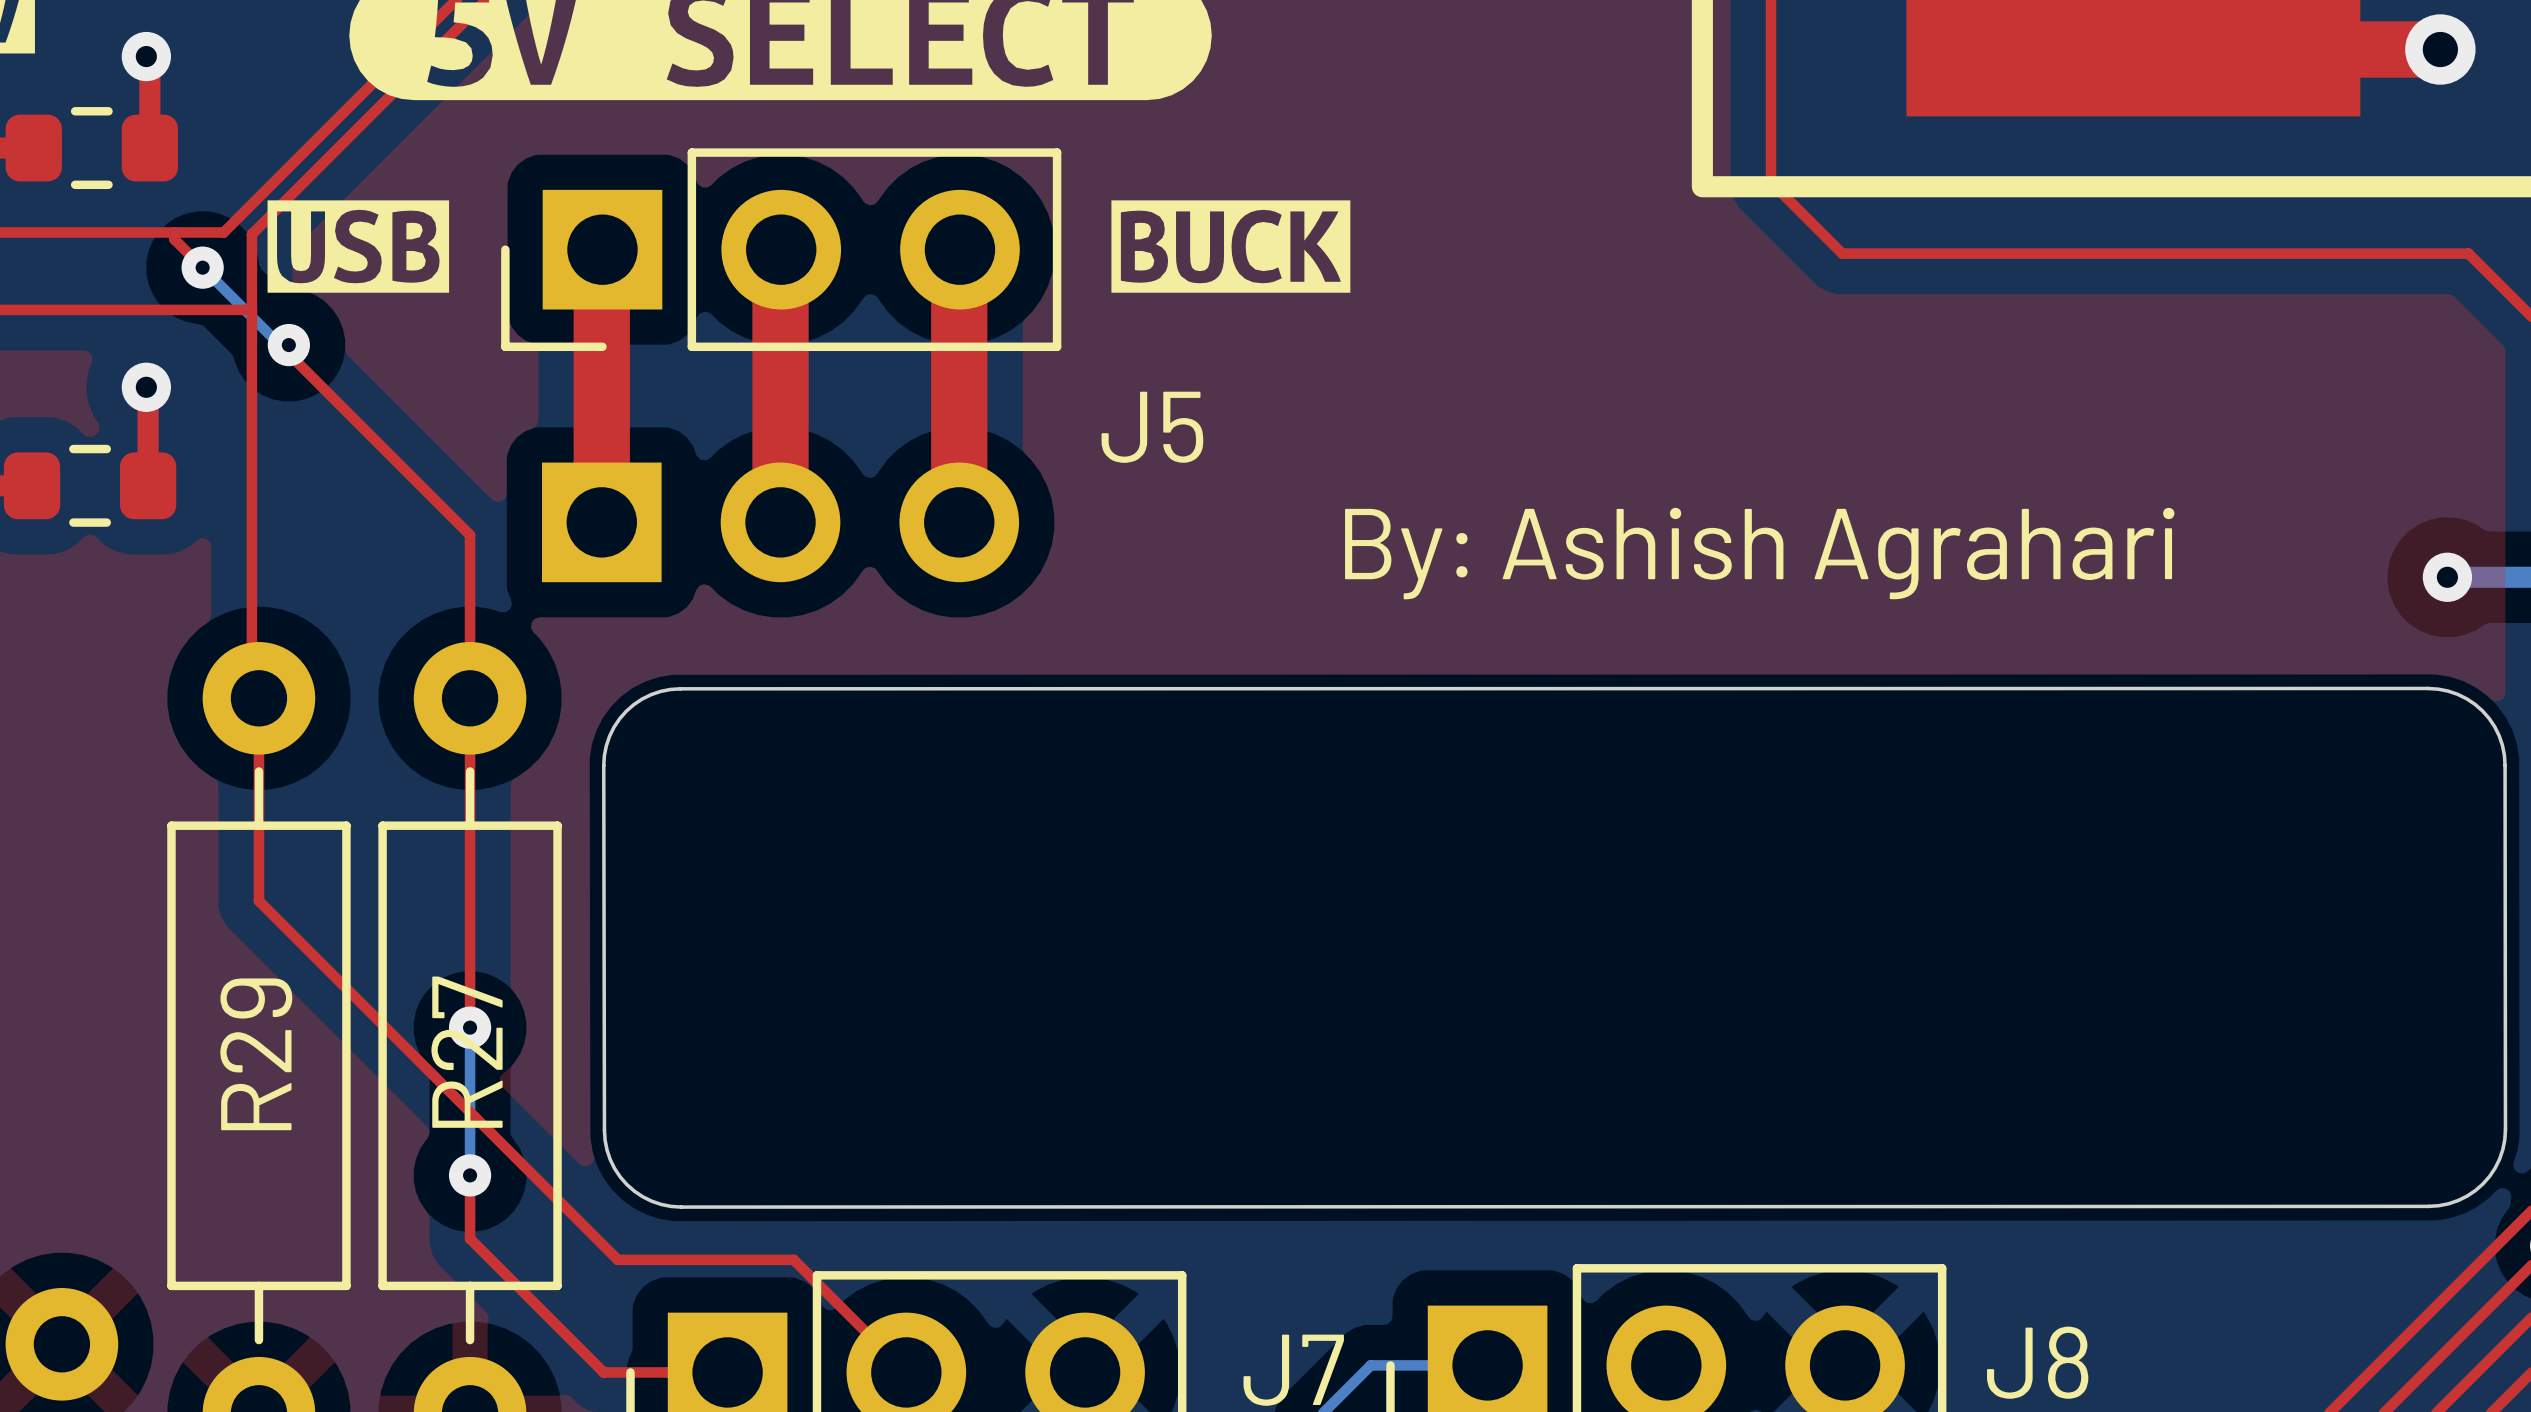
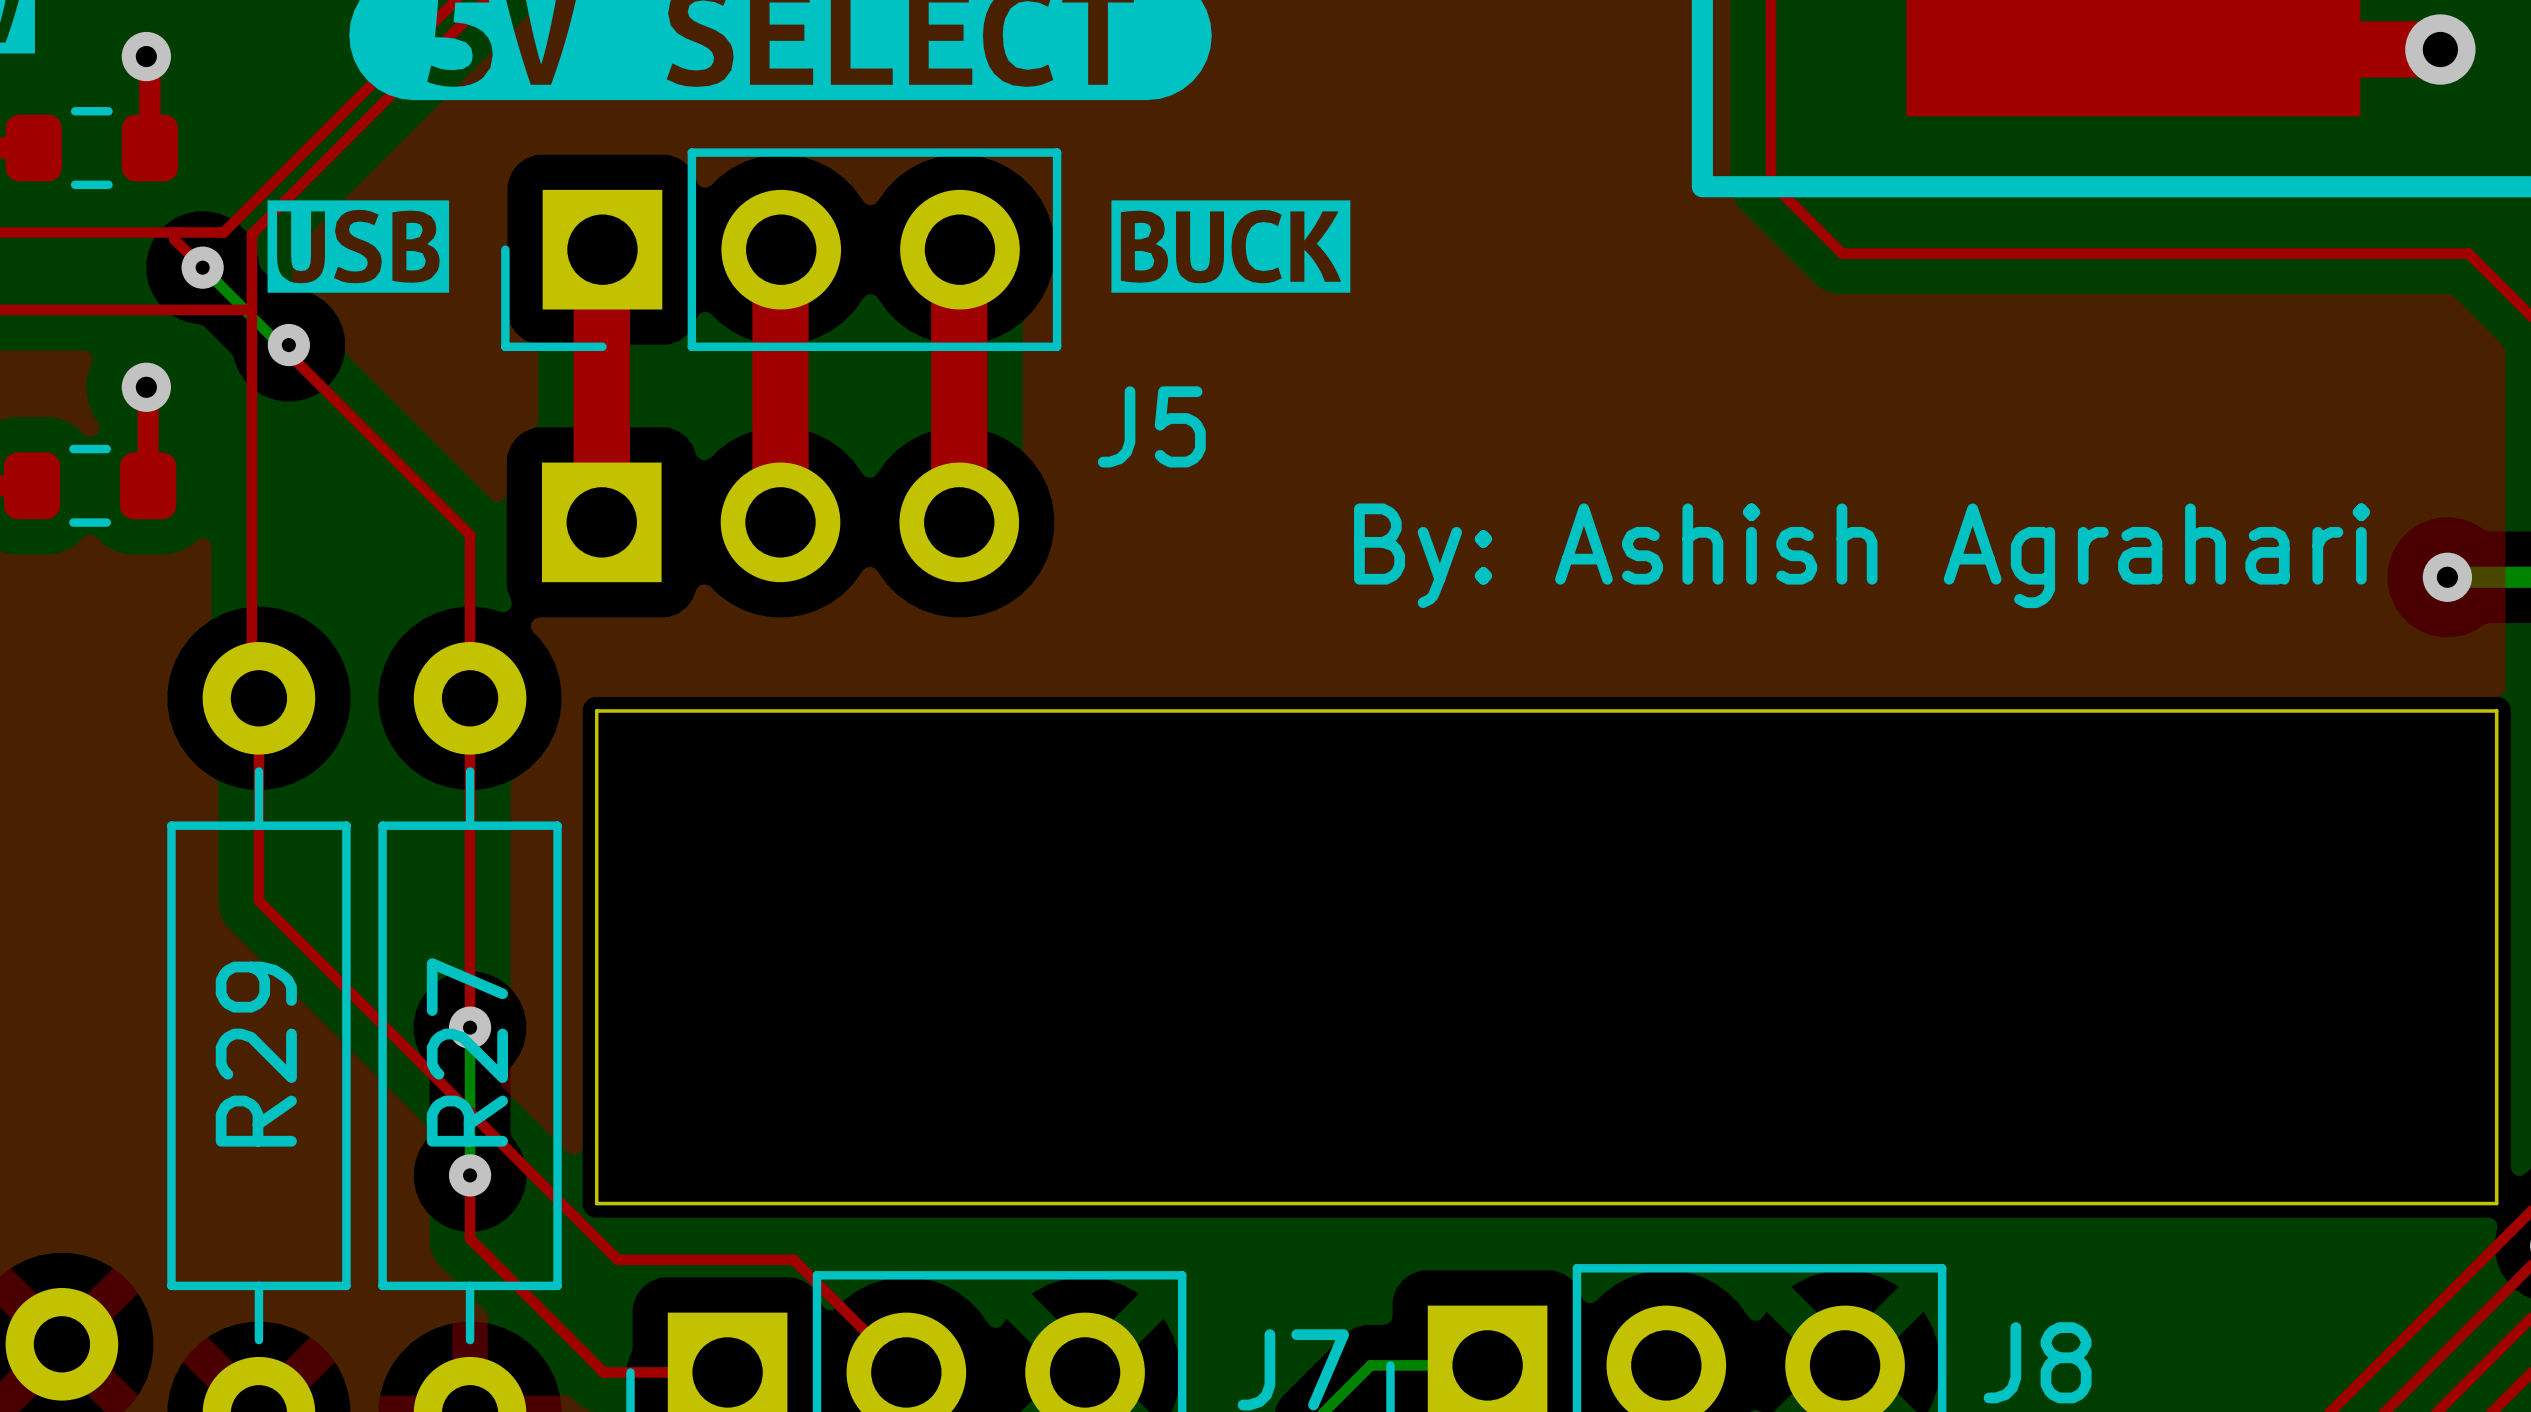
board edge: (2428, 688) (680, 688) (660, 691) (633, 704) (619, 718) (609, 736) (604, 755) (604, 1130) (607, 1150) (620, 1177) (634, 1191) (651, 1201) (681, 1207) (2428, 1206) (2448, 1203) (2467, 1196) (2483, 1183) (2499, 1159) (2504, 1139) (2505, 765) (2499, 735) (2482, 710) (2457, 694) (2428, 688) -> (596, 710) (596, 1203) (2496, 1203) (2496, 710) (596, 710)

